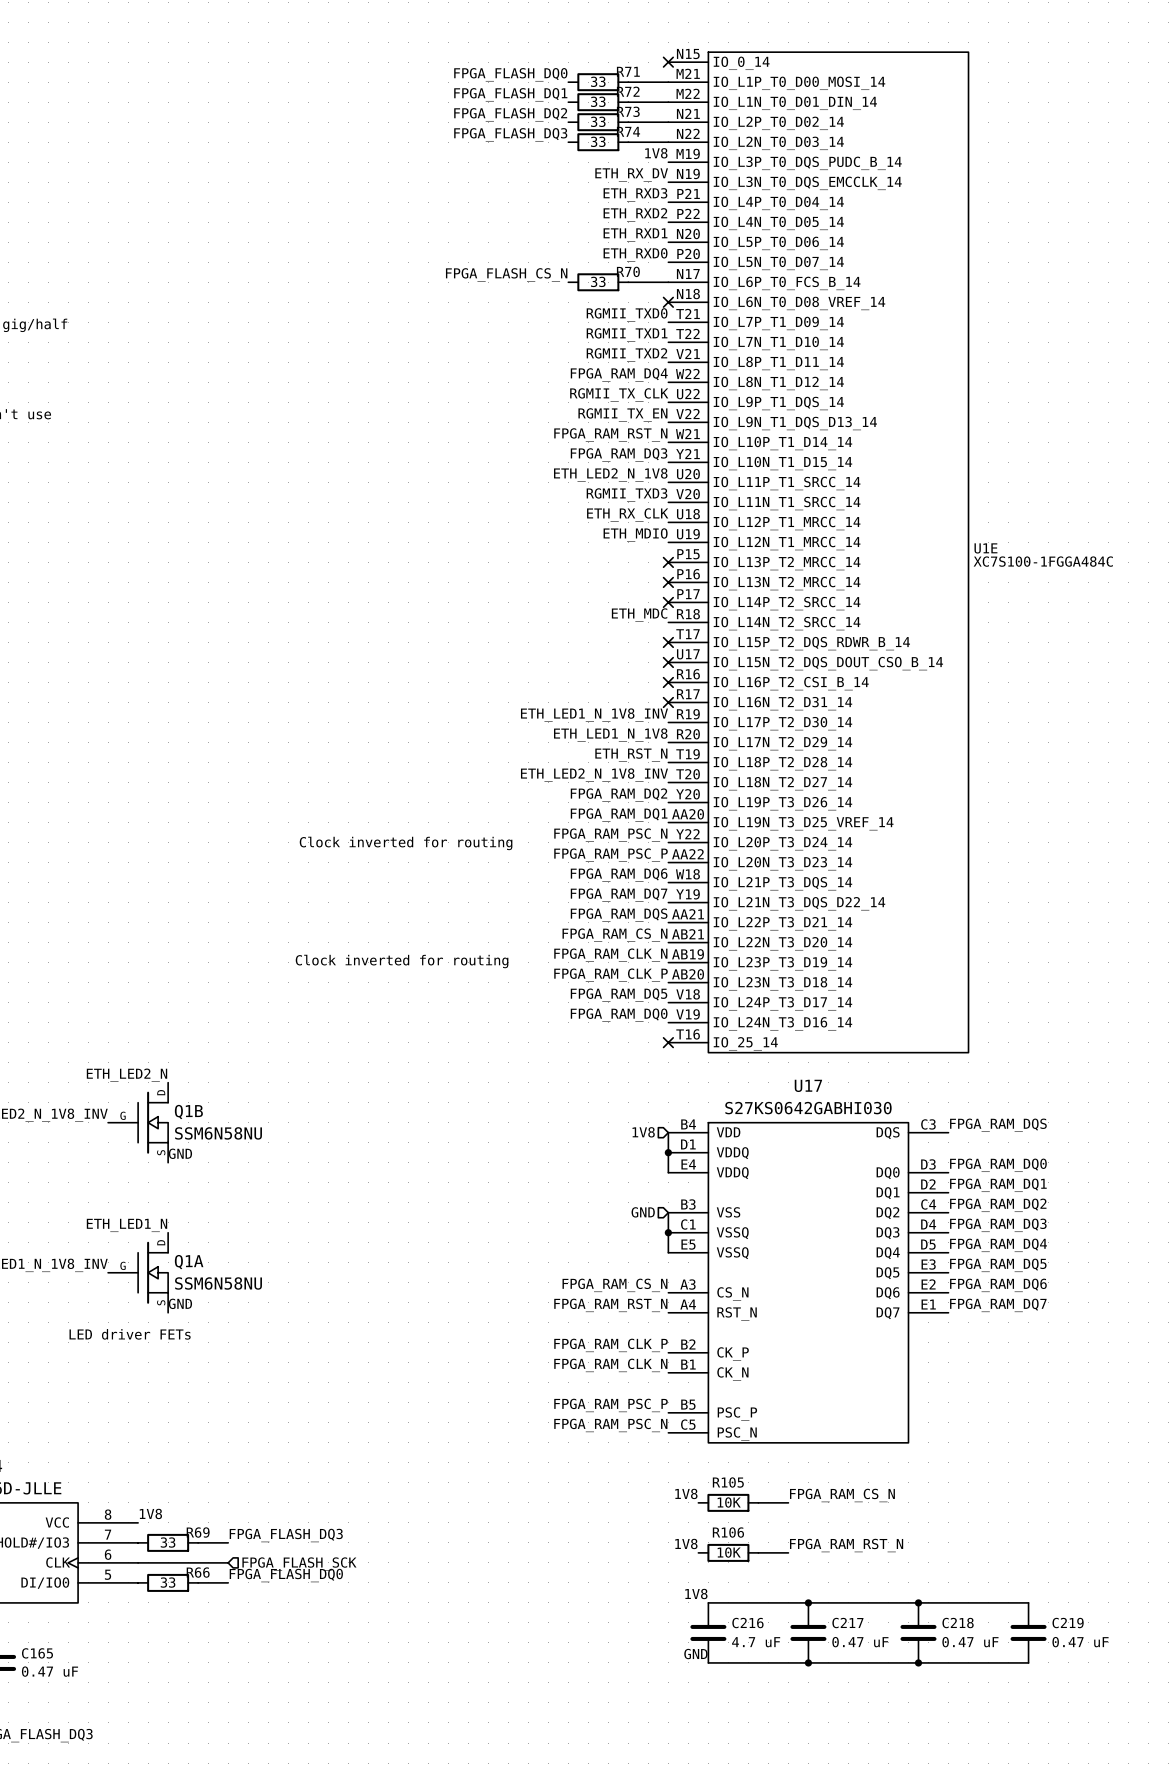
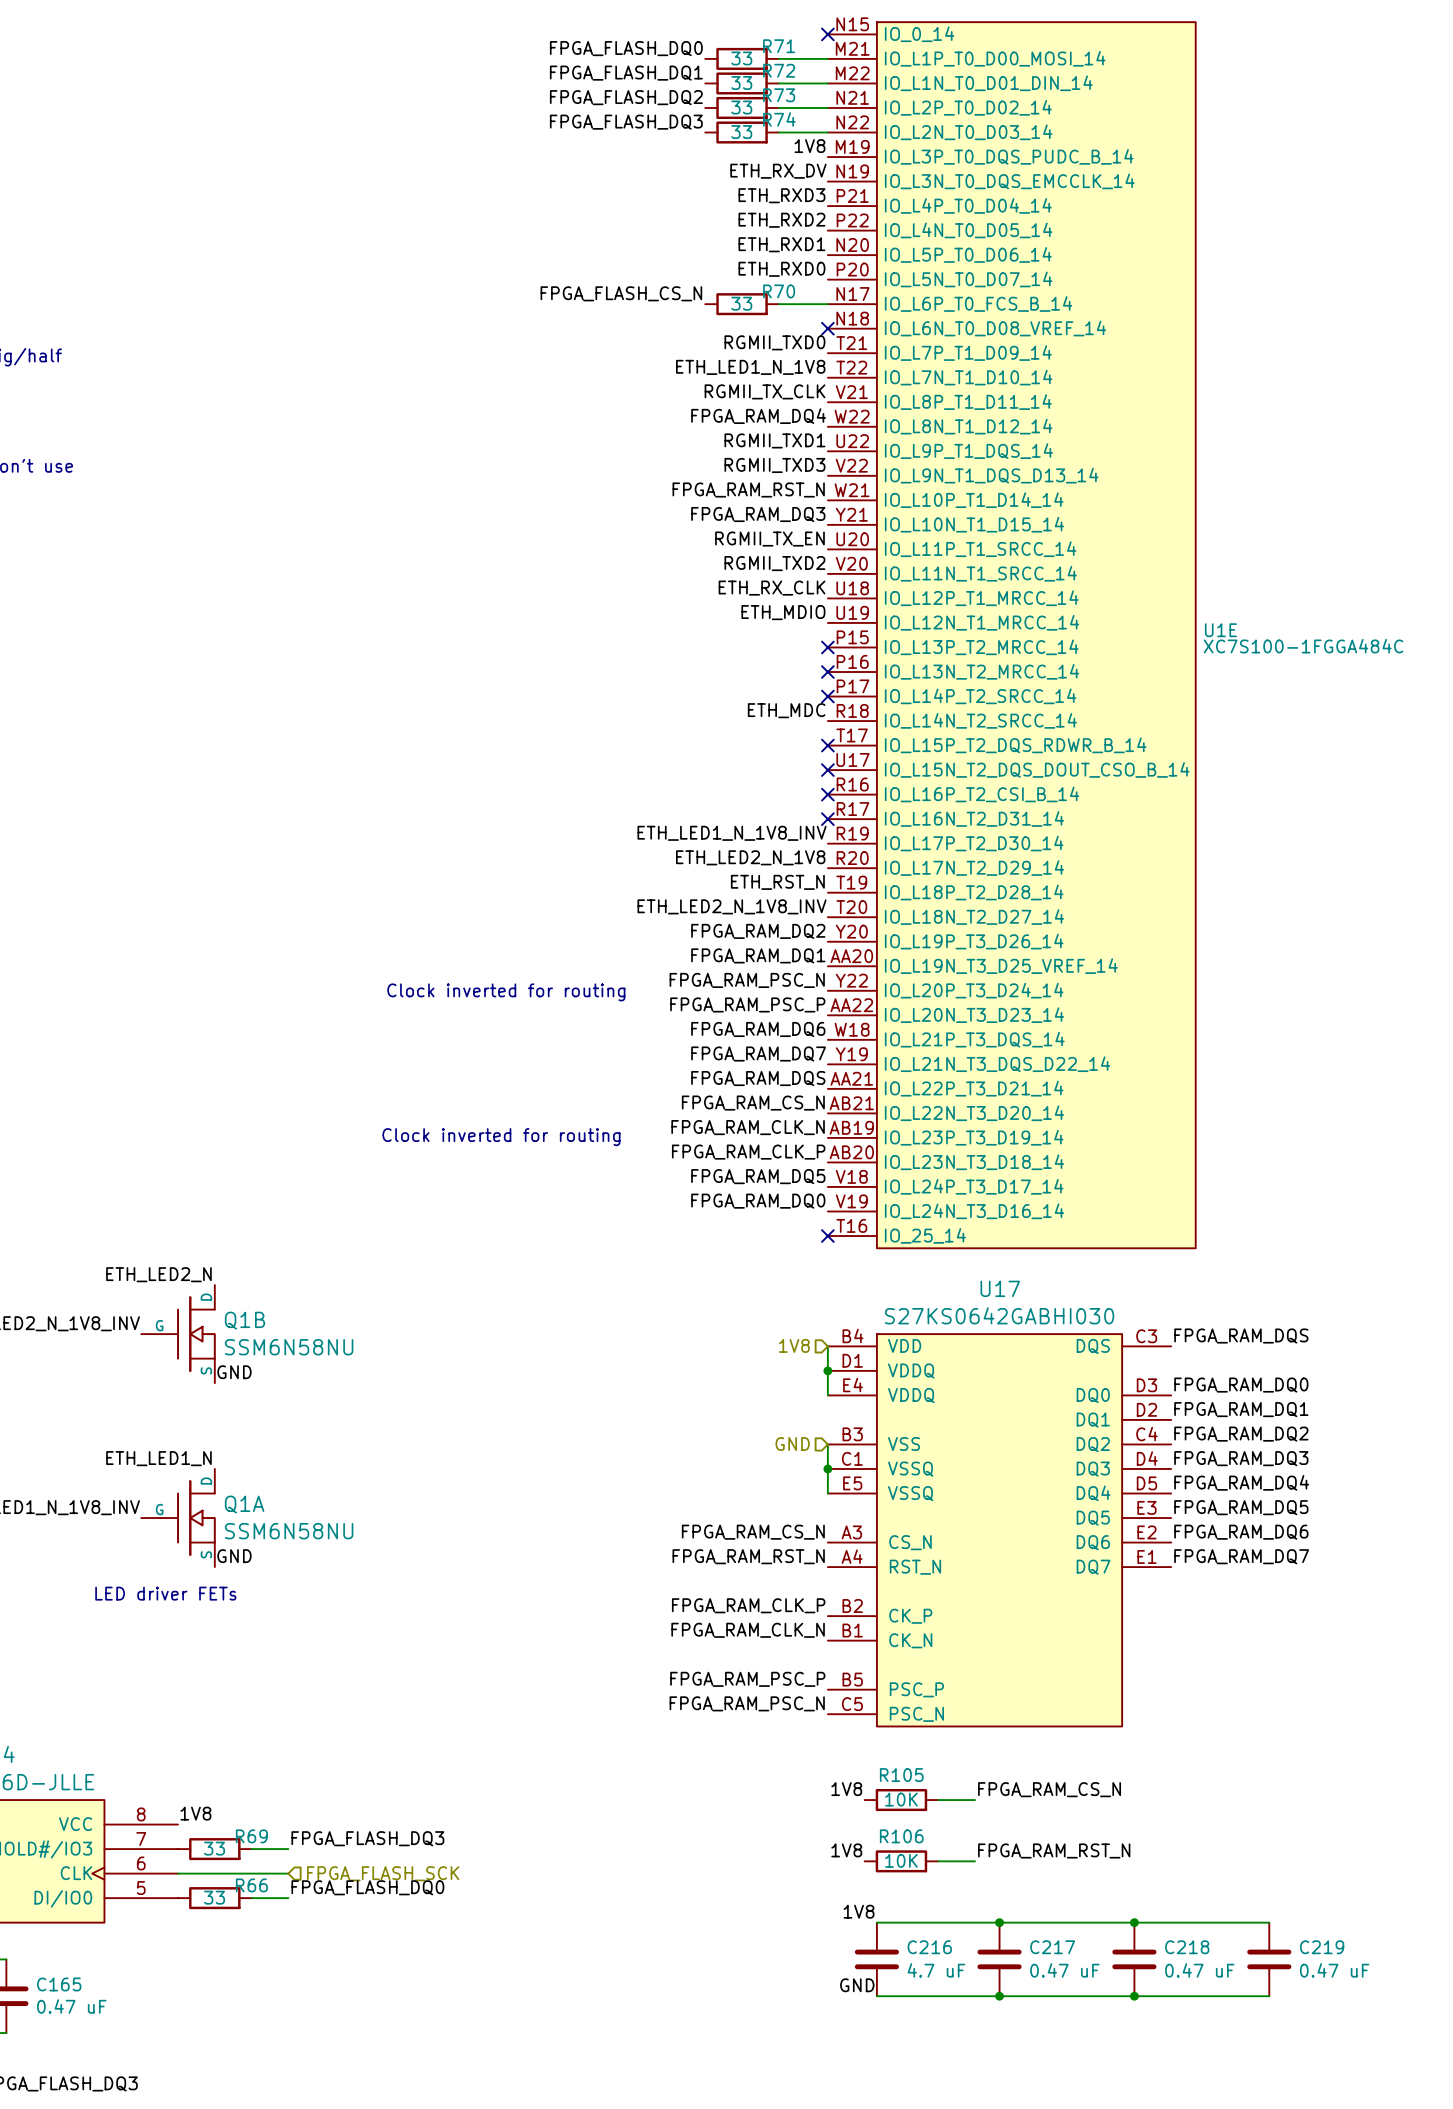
label: RGMII_TXD1 (627, 334) -> ETH_LED1_N_1V8 (750, 367)
label: RGMII_TXD2 (626, 354) -> RGMII_TX_CLK (765, 391)
label: RGMII_TX_CLK (619, 394) -> RGMII_TXD1 (774, 440)
label: RGMII_TX_EN (622, 414) -> RGMII_TXD3 (774, 465)
label: ETH_LED2_N_1V8 (610, 474) -> RGMII_TX_EN (769, 539)
label: RGMII_TXD3 (627, 494) -> RGMII_TXD2 (774, 563)
label: ETH_LED1_N_1V8 (610, 735) -> ETH_LED2_N_1V8 (750, 857)

